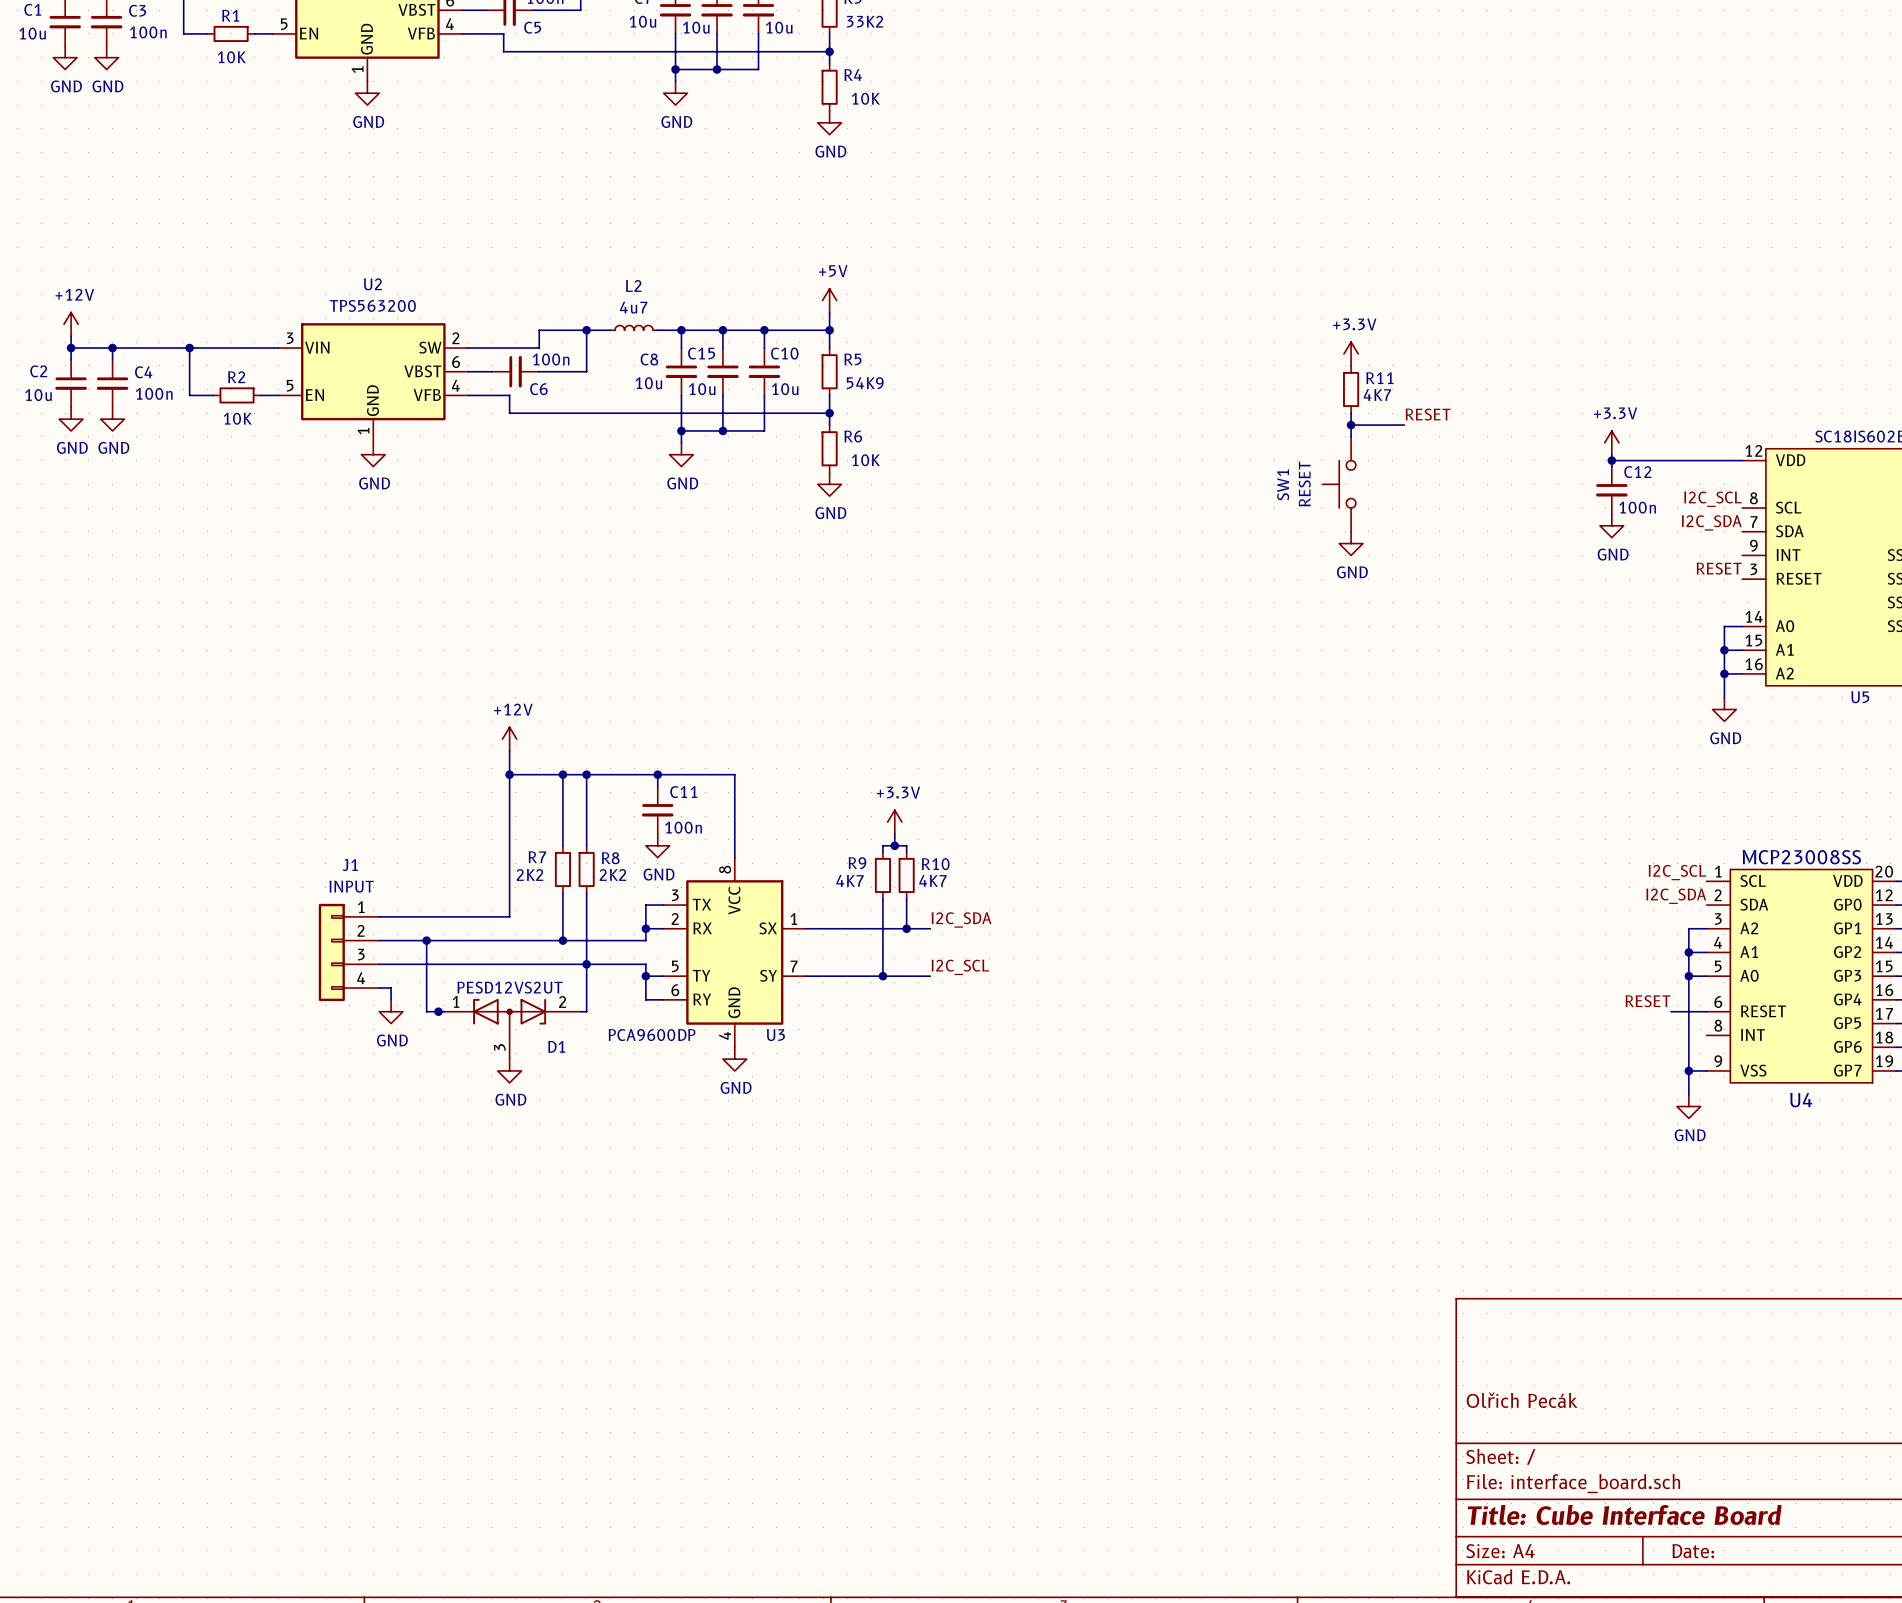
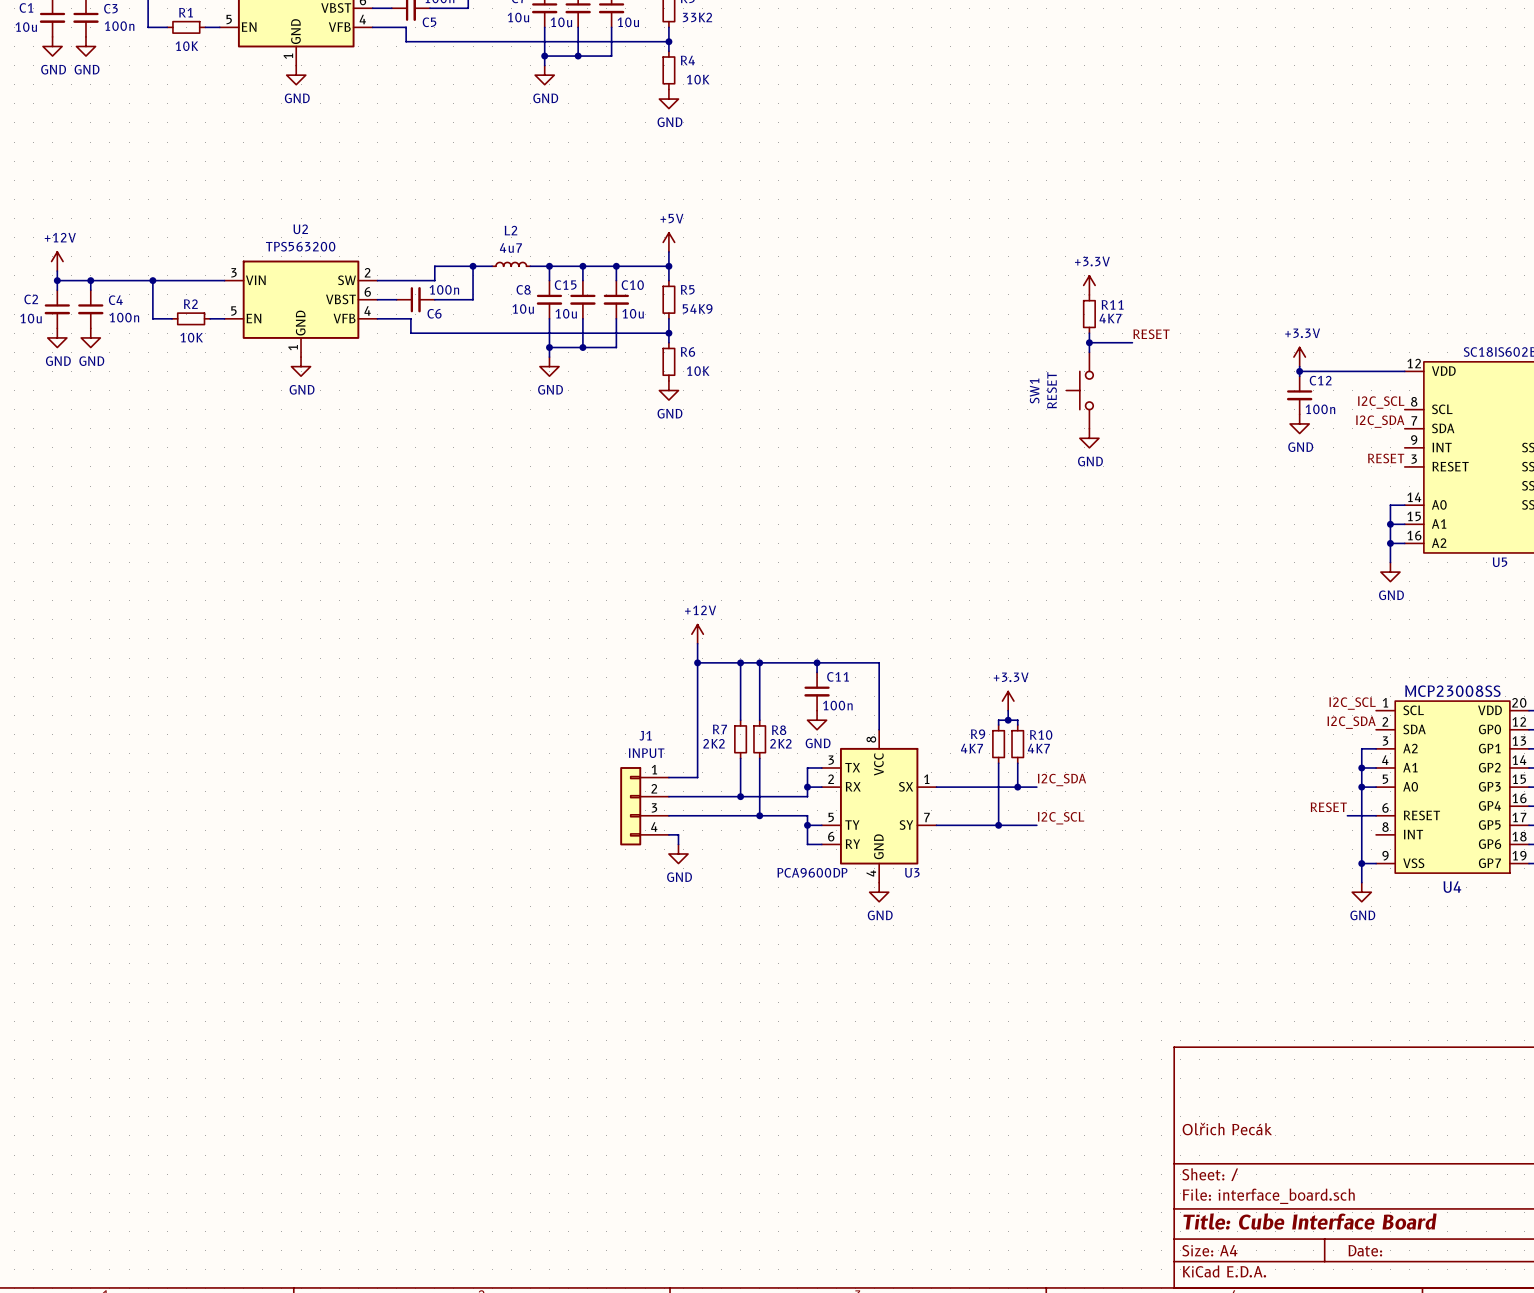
power symbol: +12V (509, 739) -> none
wire: (509, 750) (509, 916) (379, 916) -> none
wire: (509, 774) (734, 774) (734, 857) -> none
junction: (509, 774) -> none
wire: (562, 774) (562, 845) -> none
junction: (562, 774) -> none
wire: (586, 774) (586, 845) -> none
junction: (586, 774) -> none
wire: (657, 774) (657, 786) -> none
junction: (657, 774) -> none
power symbol: none -> +12V (697, 634)
wire: none -> (697, 643) (697, 777) (668, 777)
C11 position: (657, 810) -> (817, 691)
wire: none -> (697, 662) (879, 662) (879, 729)
junction: none -> (697, 662)
power symbol: +3.3V (894, 822) -> none
wire: none -> (740, 662) (740, 720)
junction: none -> (740, 662)
wire: none -> (759, 662) (759, 720)
junction: none -> (759, 662)
junction: none -> (817, 662)
wire: (894, 833) (894, 845) -> (817, 662) (817, 672)
power symbol: GND (657, 845) -> none
junction: (894, 845) -> none
wire: (882, 851) (882, 845) (906, 845) (906, 851) -> none
R7 position: (562, 869) -> (740, 739)
R8 position: (586, 869) -> (759, 739)
power symbol: none -> +3.3V (1008, 701)
R9 position: (882, 875) -> (998, 744)
R10 position: (906, 875) -> (1017, 744)
wire: none -> (1008, 710) (1008, 720)
wire: (562, 893) (562, 940) -> none
wire: (586, 893) (586, 1011) (580, 1011) -> none
power symbol: none -> GND (817, 720)
junction: none -> (1008, 720)
wire: (882, 899) (882, 976) -> none
wire: (906, 899) (906, 928) -> none
wire: none -> (998, 724) (998, 720) (1017, 720) (1017, 724)
wire: (663, 905) (645, 905) (645, 940) (379, 940) -> none
label: I2C_SDA (961, 919) -> none
wire: (645, 928) (663, 928) -> none
junction: (645, 928) -> none
wire: (805, 928) (930, 928) -> none
junction: (906, 928) -> none
wire: (426, 940) (426, 1011) (444, 1011) -> none
junction: (426, 940) -> none
junction: (562, 940) -> none
wire: none -> (740, 758) (740, 796)
wire: none -> (759, 758) (759, 815)
wire: none -> (998, 763) (998, 825)
wire: none -> (1017, 763) (1017, 787)
J1 position: (349, 952) -> (644, 806)
U3 position: (734, 952) -> (879, 806)
wire: none -> (821, 767) (807, 767) (807, 796) (668, 796)
wire: (379, 964) (645, 964) (645, 999) (663, 999) -> none
junction: (586, 964) -> none
label: I2C_SCL (960, 967) -> none
label: none -> I2C_SDA (1061, 780)
wire: (645, 976) (663, 976) -> none
junction: (645, 976) -> none
wire: (805, 976) (930, 976) -> none
junction: (882, 976) -> none
wire: none -> (807, 787) (821, 787)
junction: none -> (807, 787)
wire: none -> (936, 787) (1036, 787)
junction: none -> (1017, 787)
wire: (379, 988) (391, 988) (391, 999) -> none
junction: none -> (740, 796)
power symbol: GND (391, 1011) -> none
junction: (438, 1011) -> none
wire: none -> (668, 815) (807, 815) (807, 844) (821, 844)
junction: none -> (759, 815)
label: none -> I2C_SCL (1061, 818)
wire: none -> (807, 825) (821, 825)
junction: none -> (807, 825)
wire: none -> (936, 825) (1036, 825)
junction: none -> (998, 825)
D1: PESD12VS2UT (509, 1029) -> none
wire: none -> (668, 834) (678, 834) (678, 844)
power symbol position: GND (734, 1059) -> GND (678, 854)
power symbol: GND (509, 1070) -> none
power symbol: none -> GND (879, 892)

